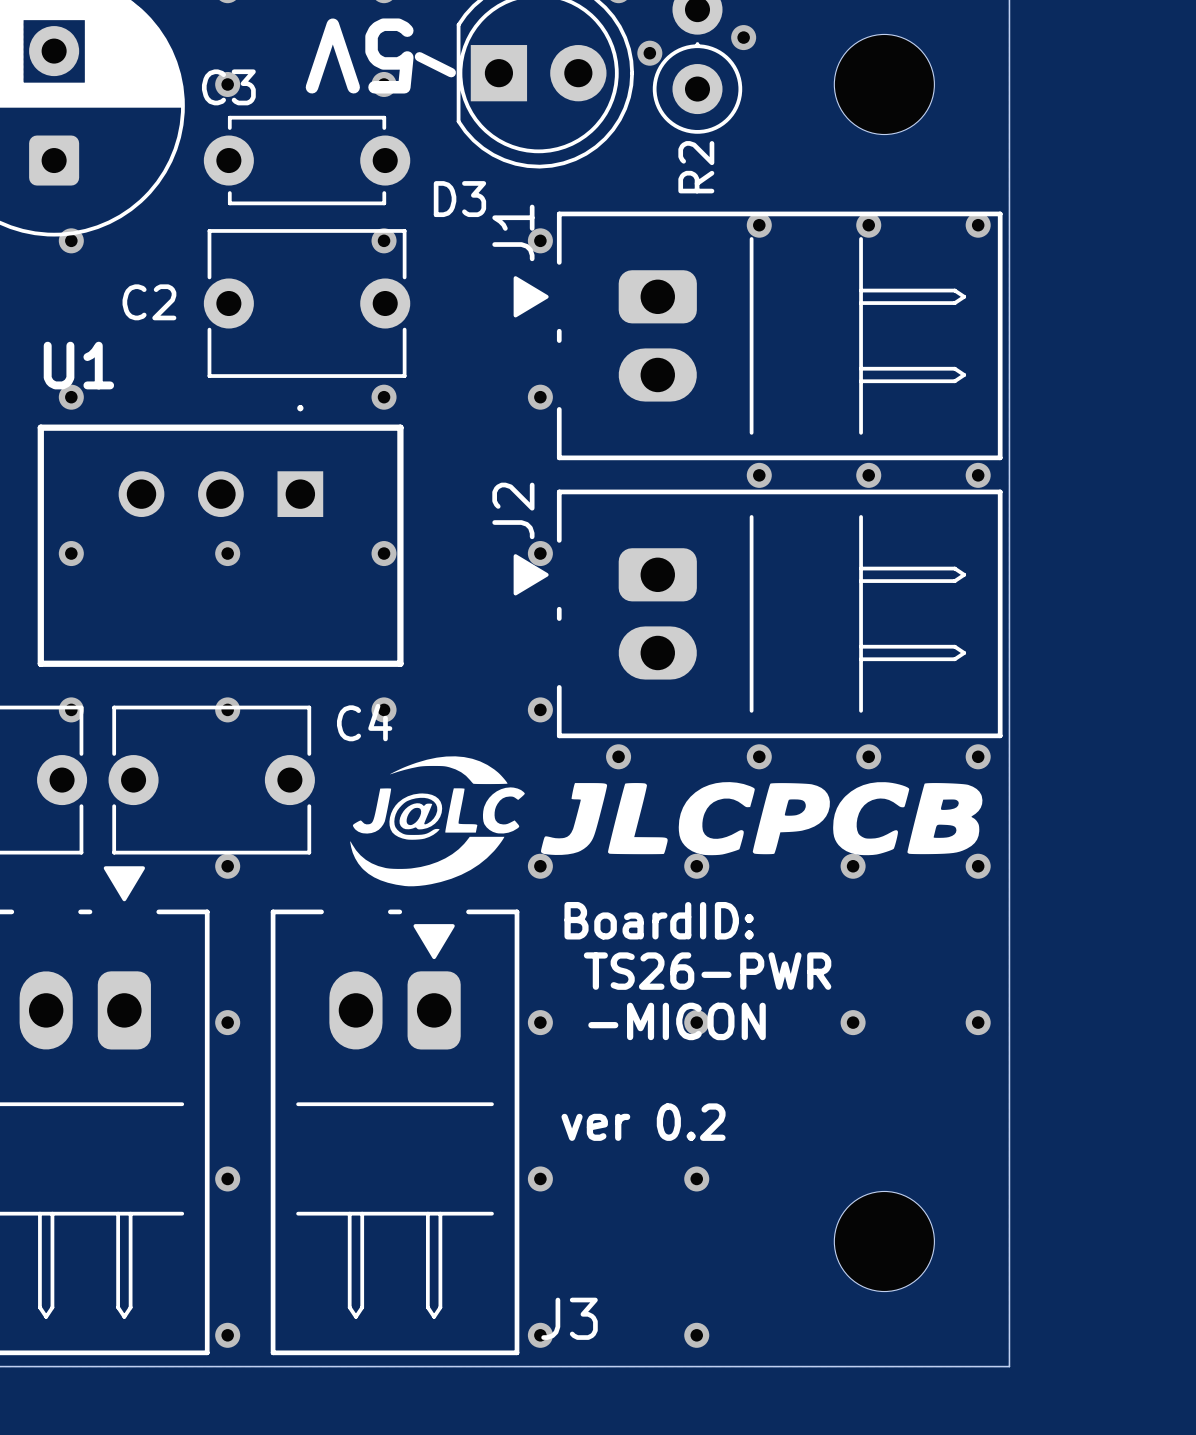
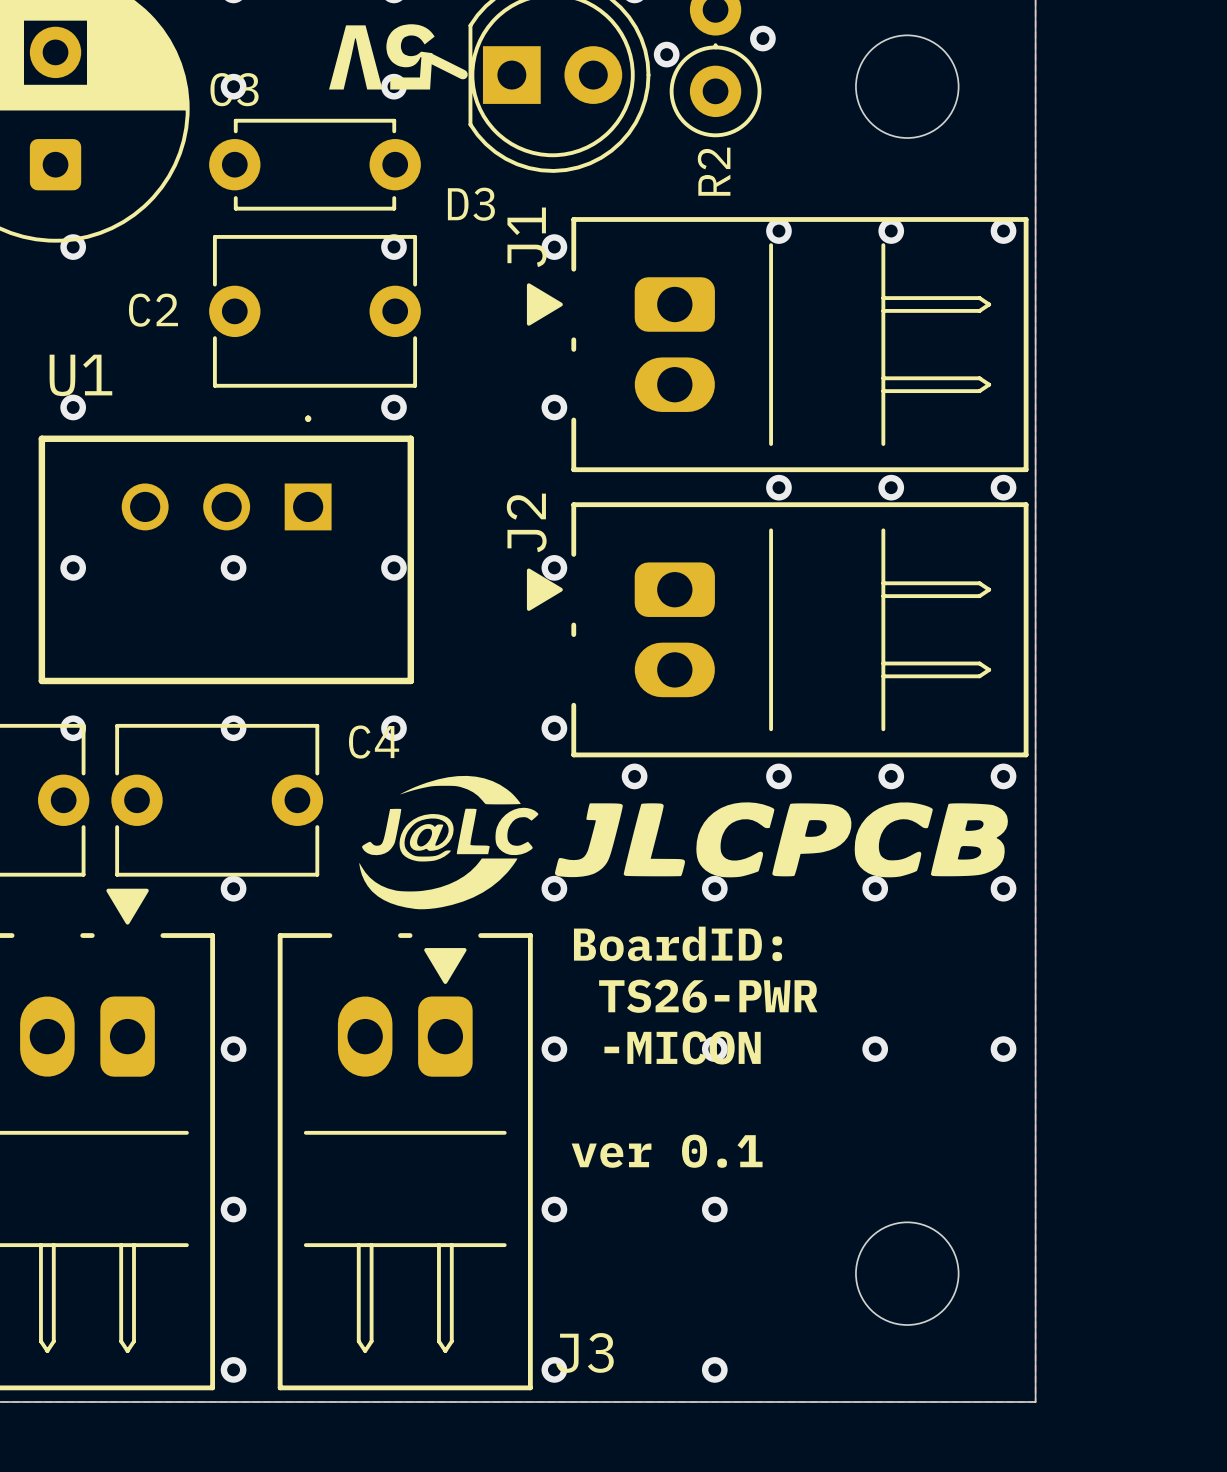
text: ver 0.2 (643, 1122) -> ver 0.1 (667, 1151)

